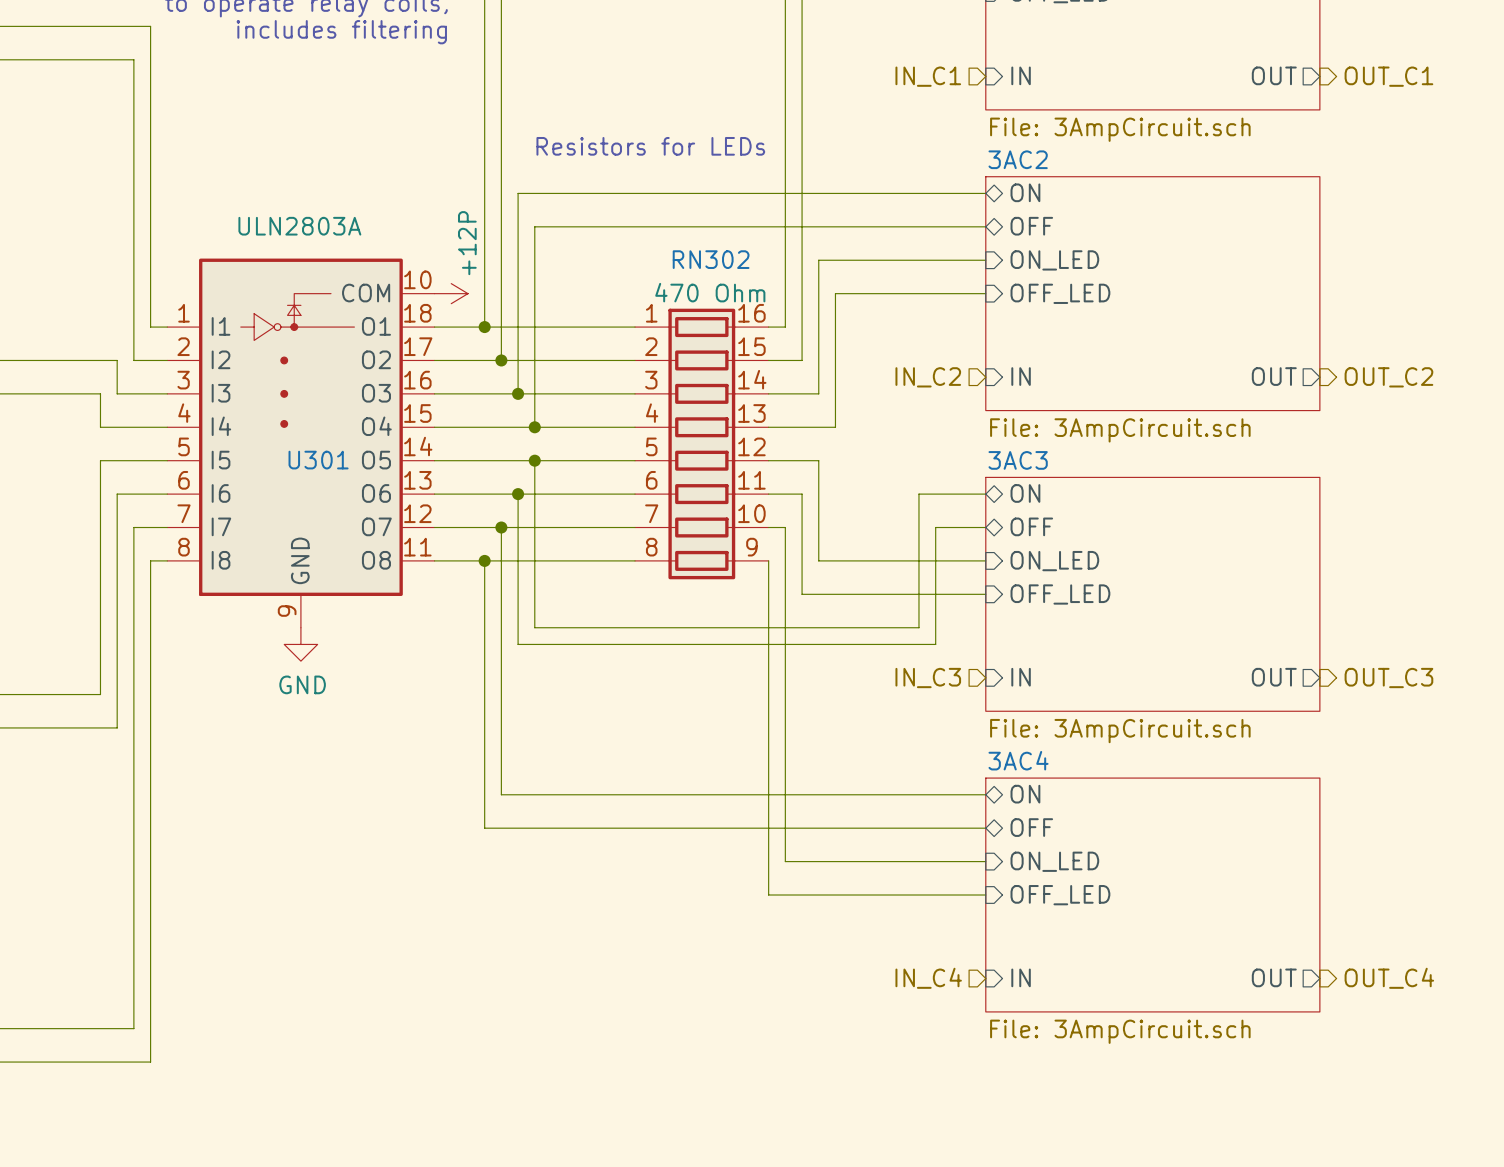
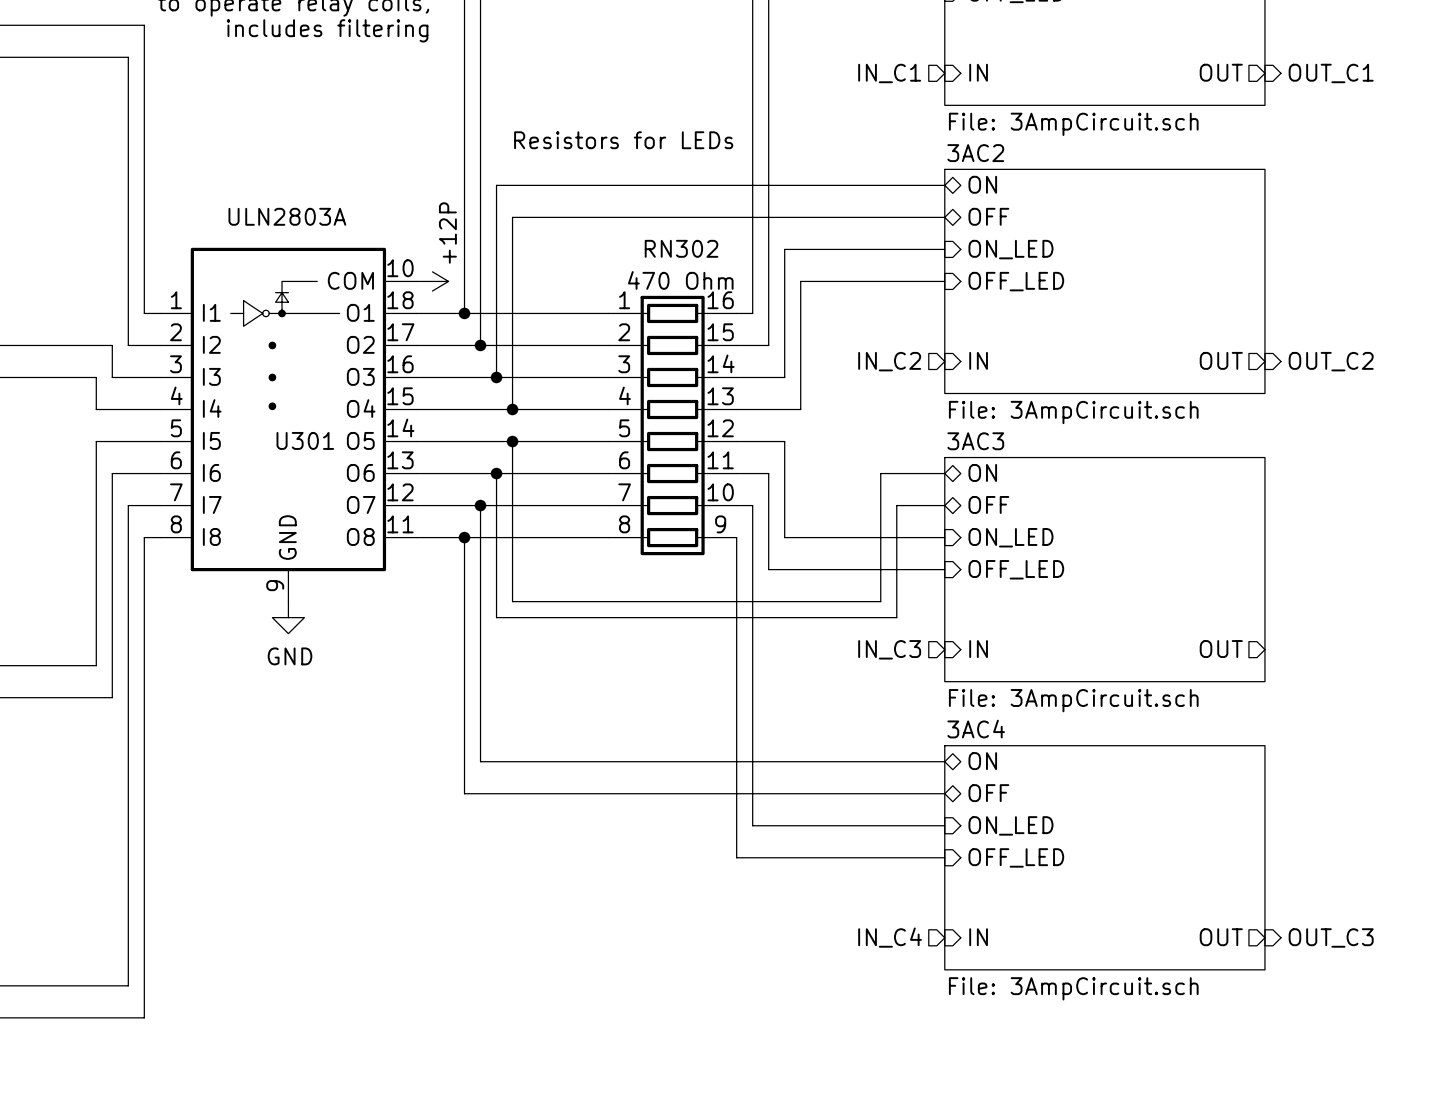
hierarchical label: OUT_C3 (1388, 678) -> none
hierarchical label: OUT_C4 (1389, 978) -> OUT_C3 (1331, 937)

